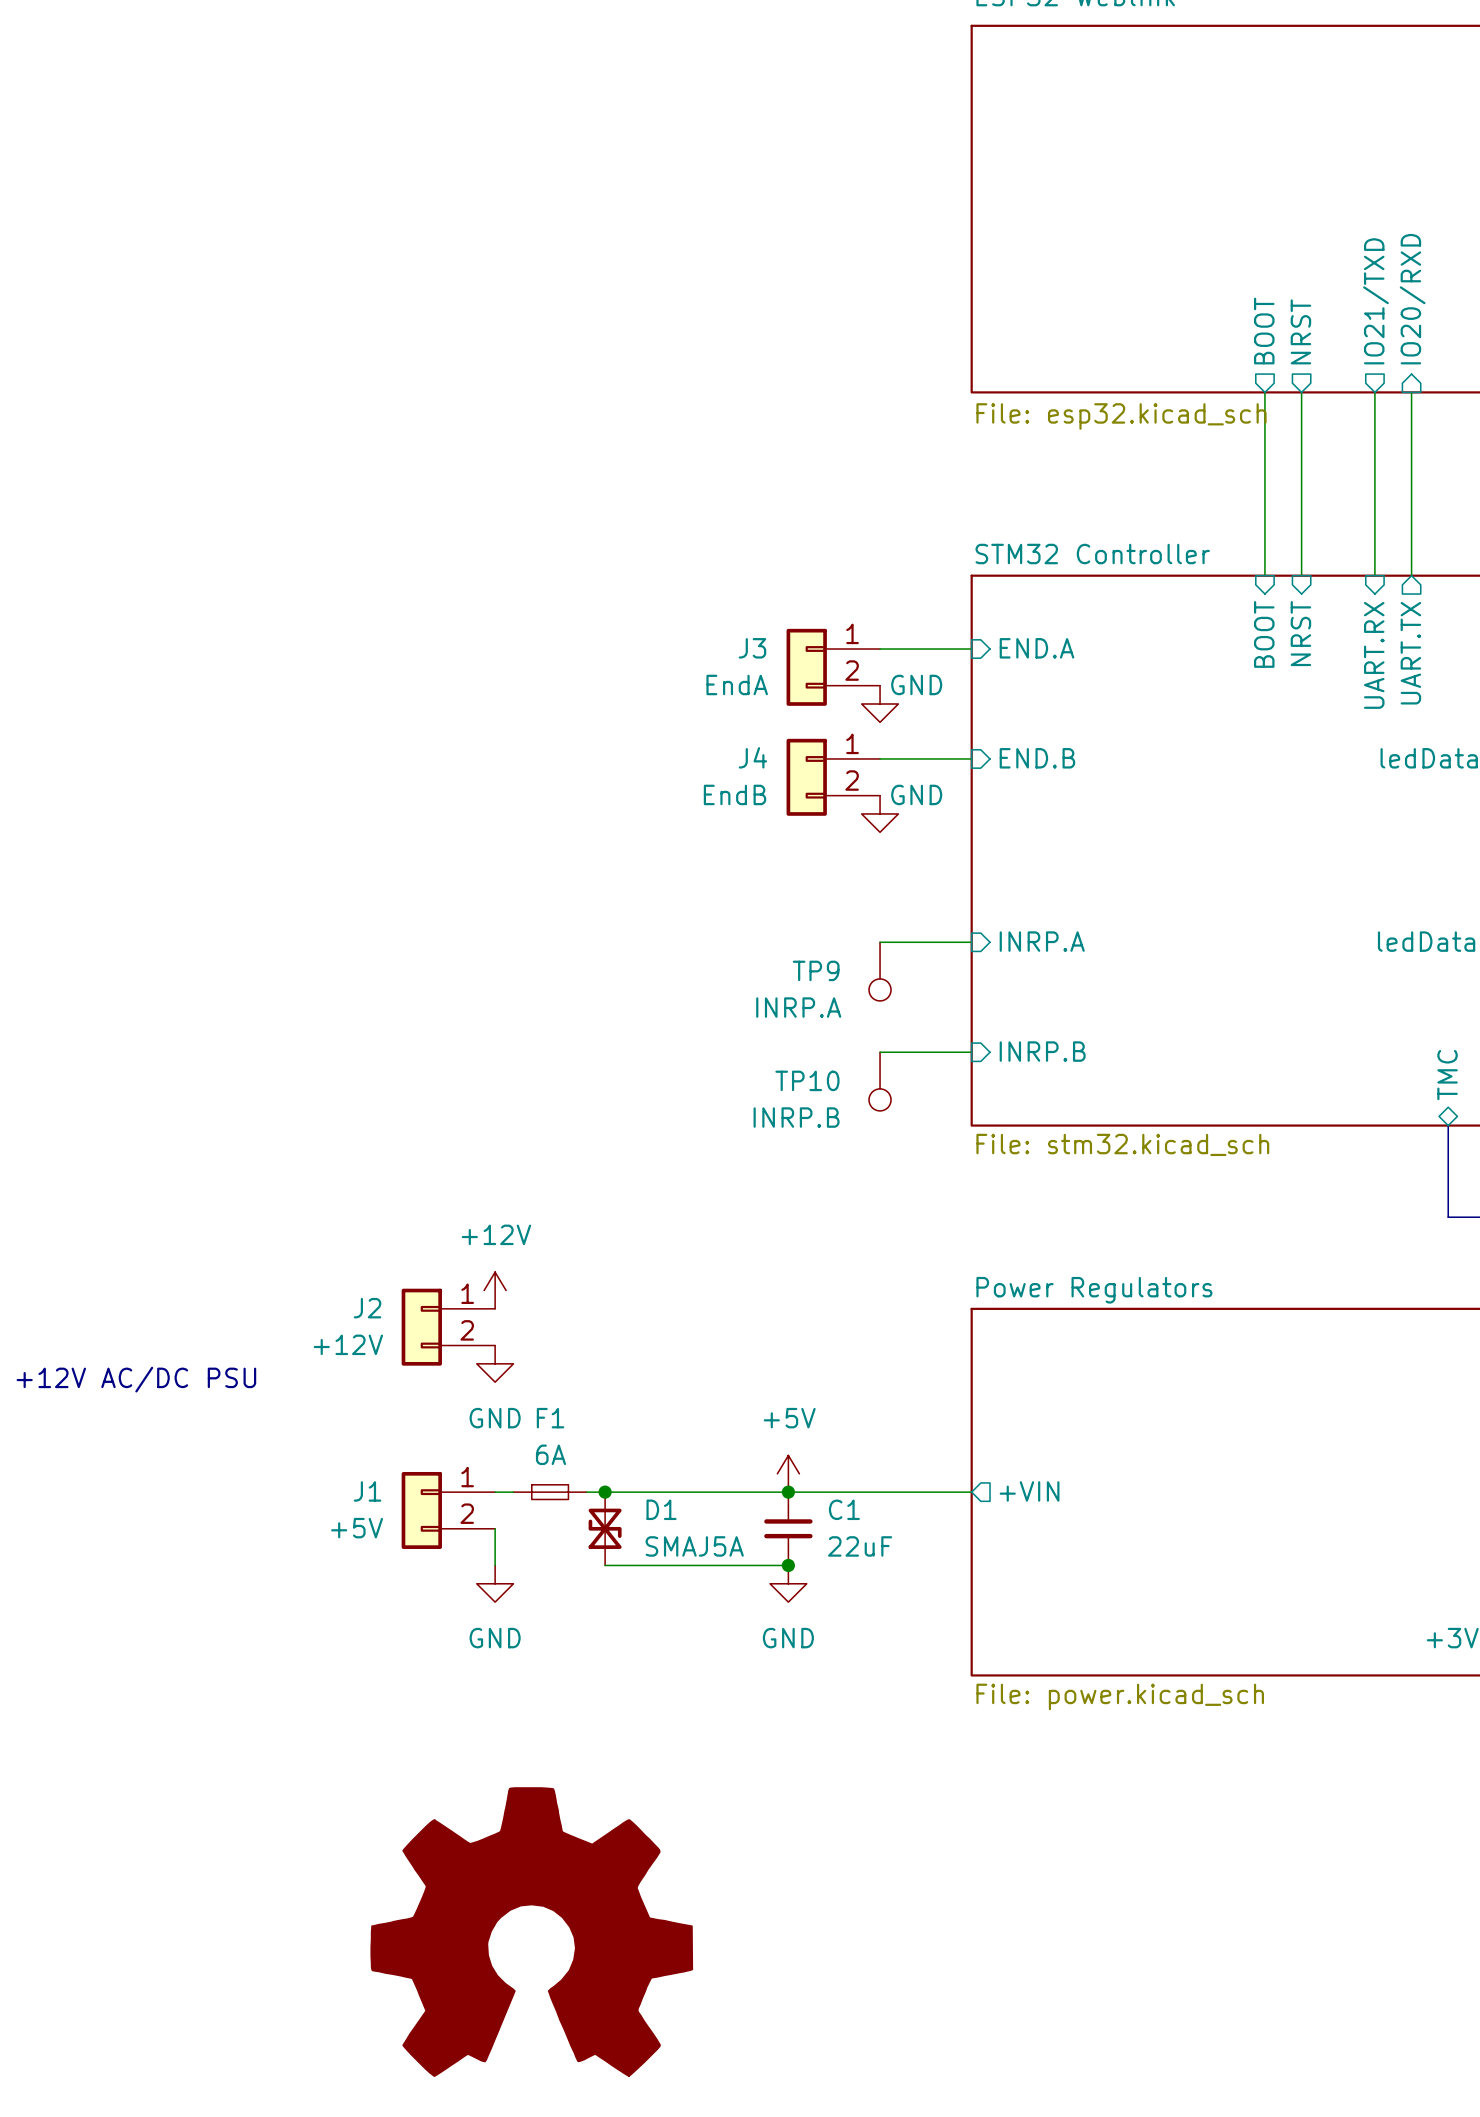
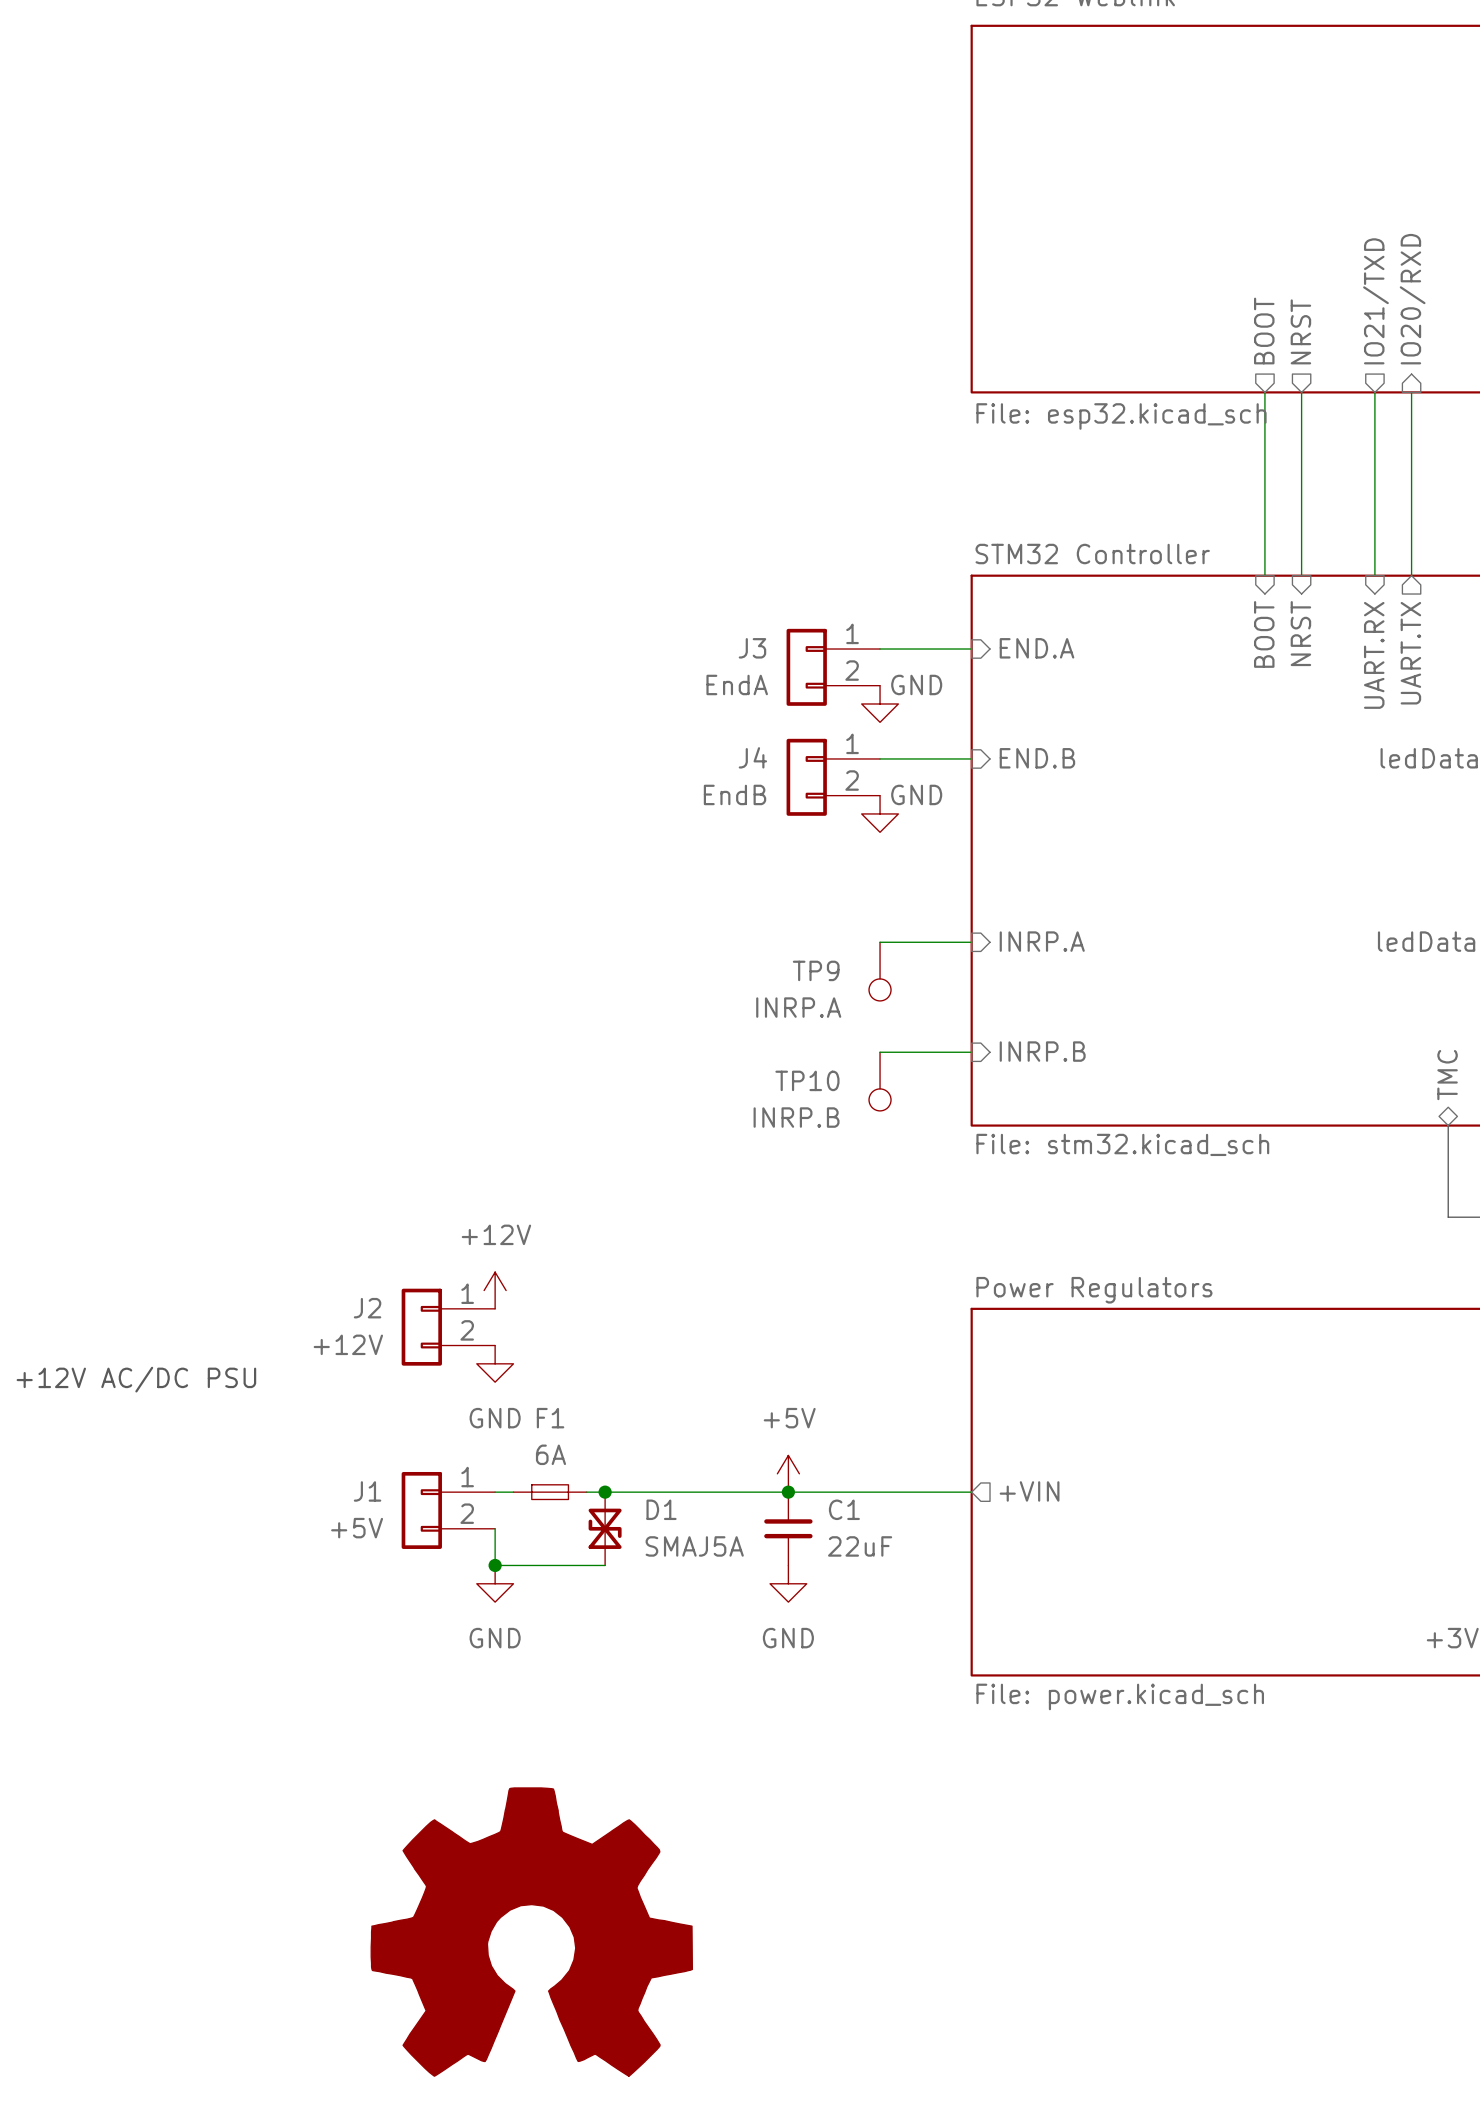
junction: none -> (495, 1565)
wire: (605, 1565) (788, 1565) -> (605, 1565) (495, 1565)
junction: (788, 1565) -> none

